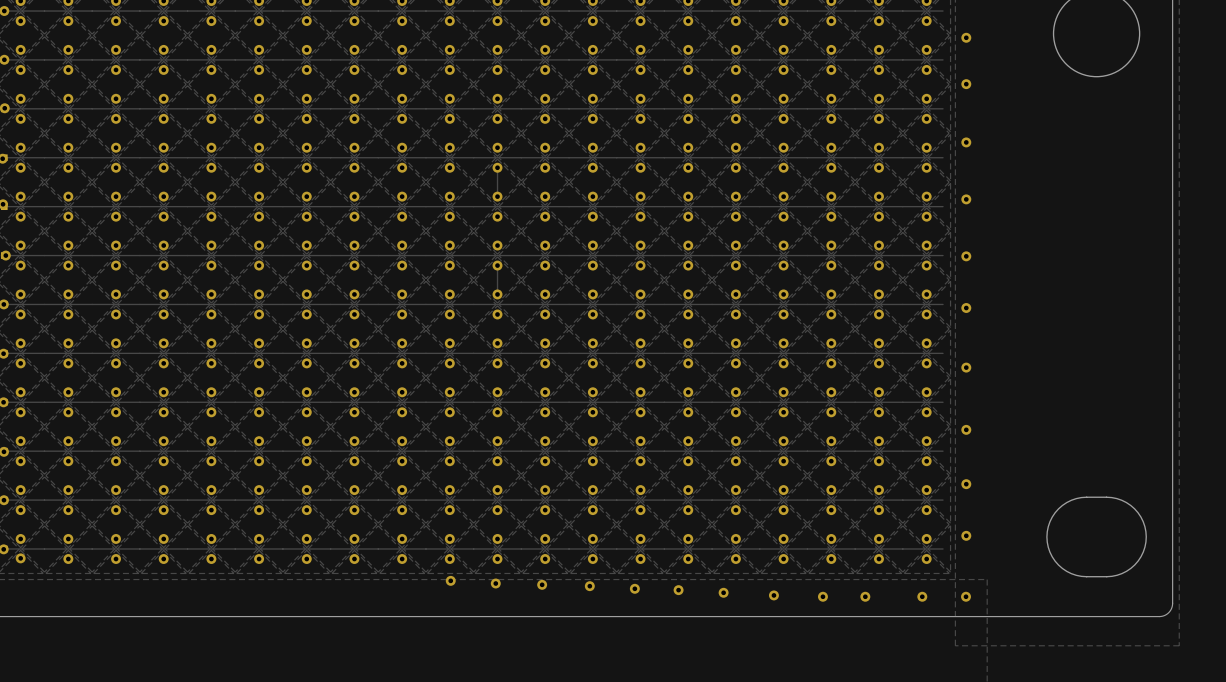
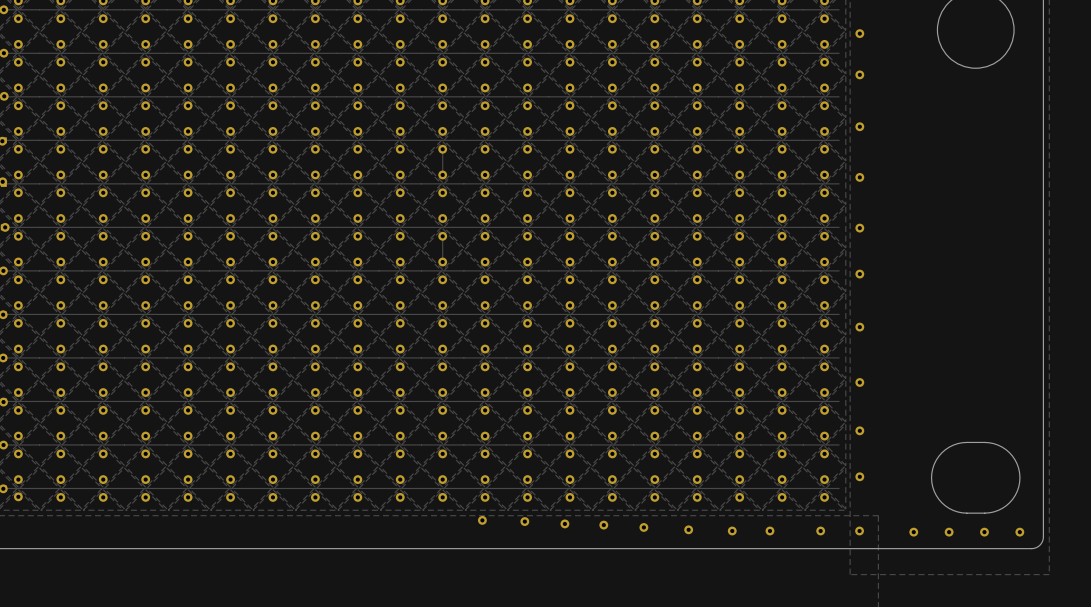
via: (450, 580) -> none
via: (495, 583) -> none
via: none -> (913, 532)
via: none -> (949, 532)
via: none -> (984, 532)
via: none -> (1019, 532)

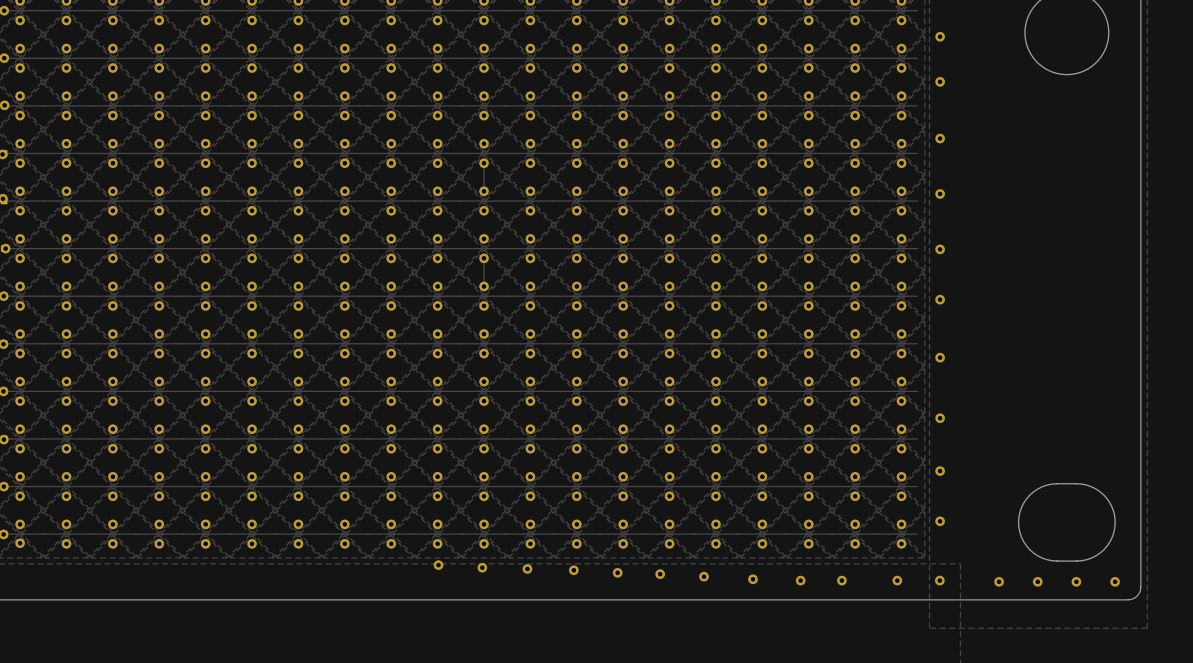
via: none -> (438, 565)
via: none -> (482, 567)

